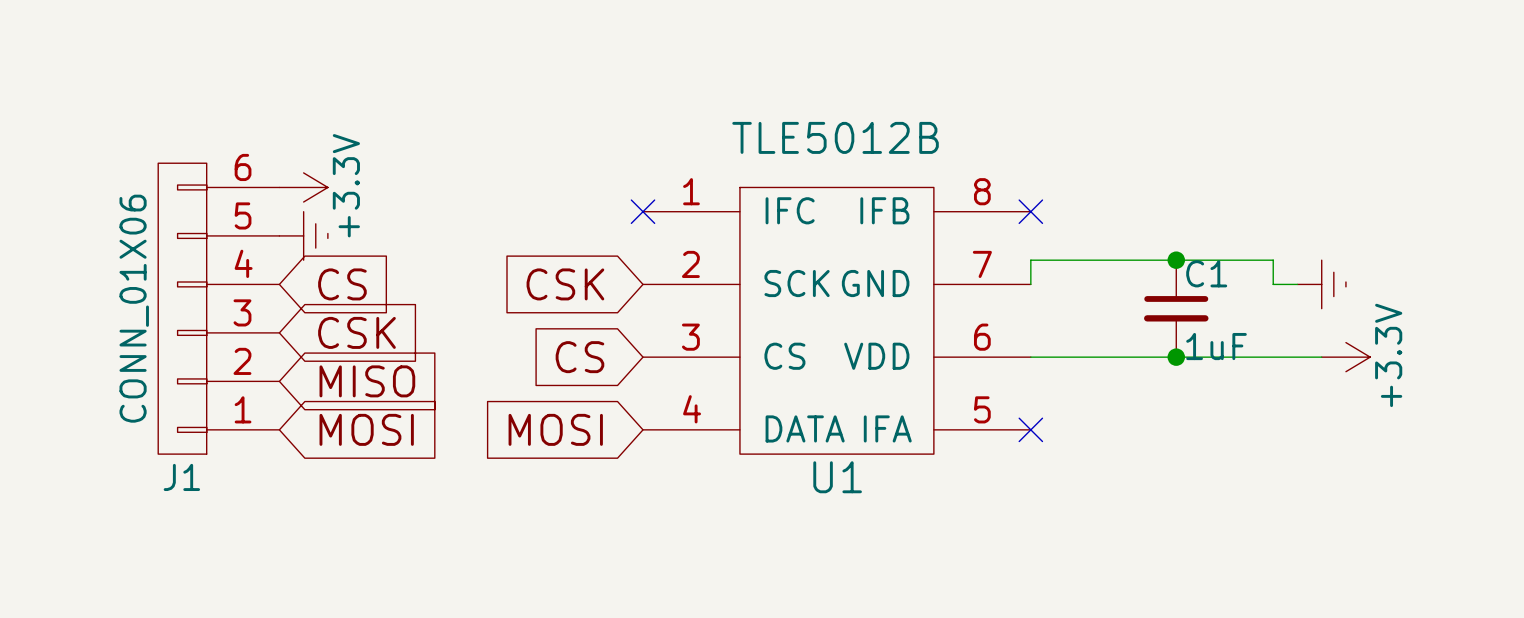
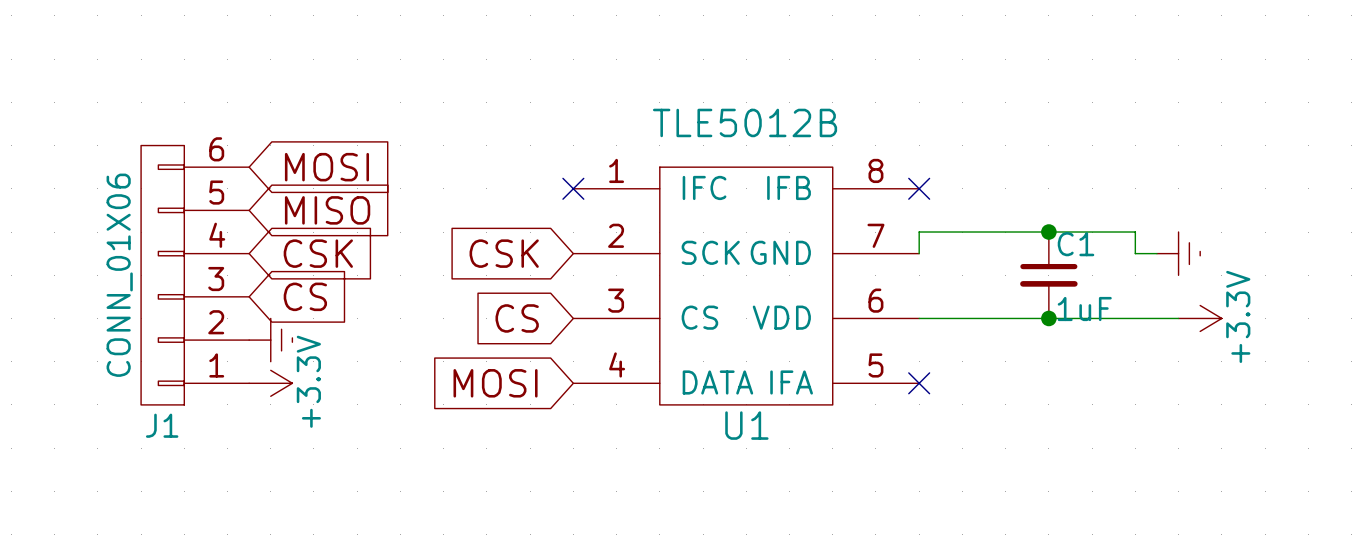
power symbol position: +3.3V (303, 187) -> +3.3V (270, 383)
power symbol position: (303, 235) -> (270, 340)
global label: CS (342, 284) -> CSK (318, 253)
global label: CSK (356, 332) -> CS (305, 296)
global label position: MISO (367, 381) -> MISO (327, 210)
global label position: MOSI (366, 429) -> MOSI (326, 167)

